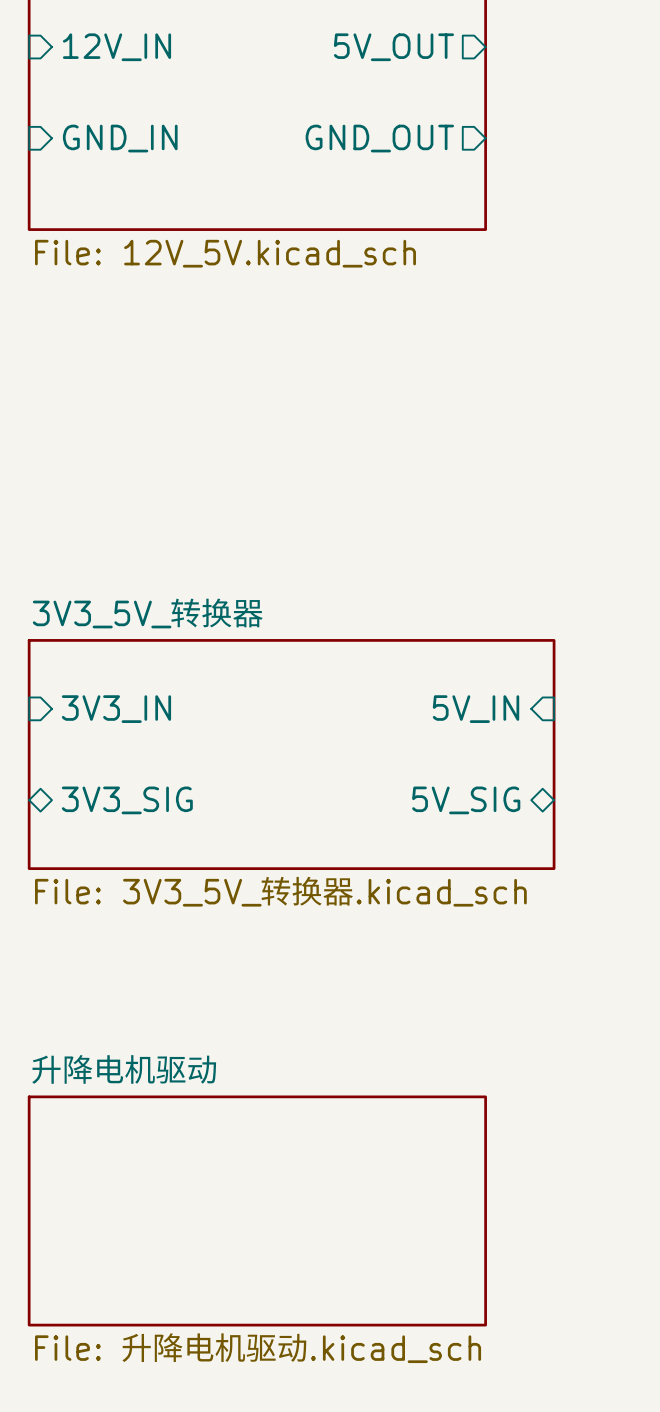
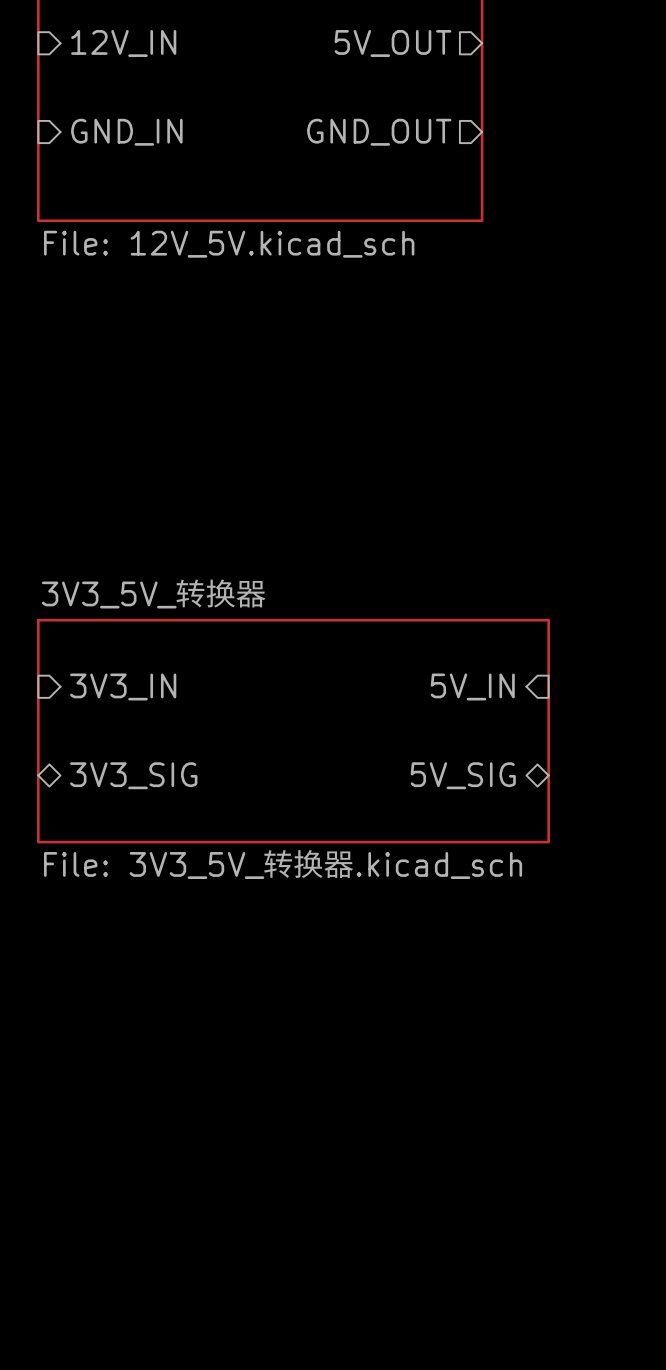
sheet 升降电机驱动: File: 升降电机驱动.kicad_sch (257, 1210) -> none

